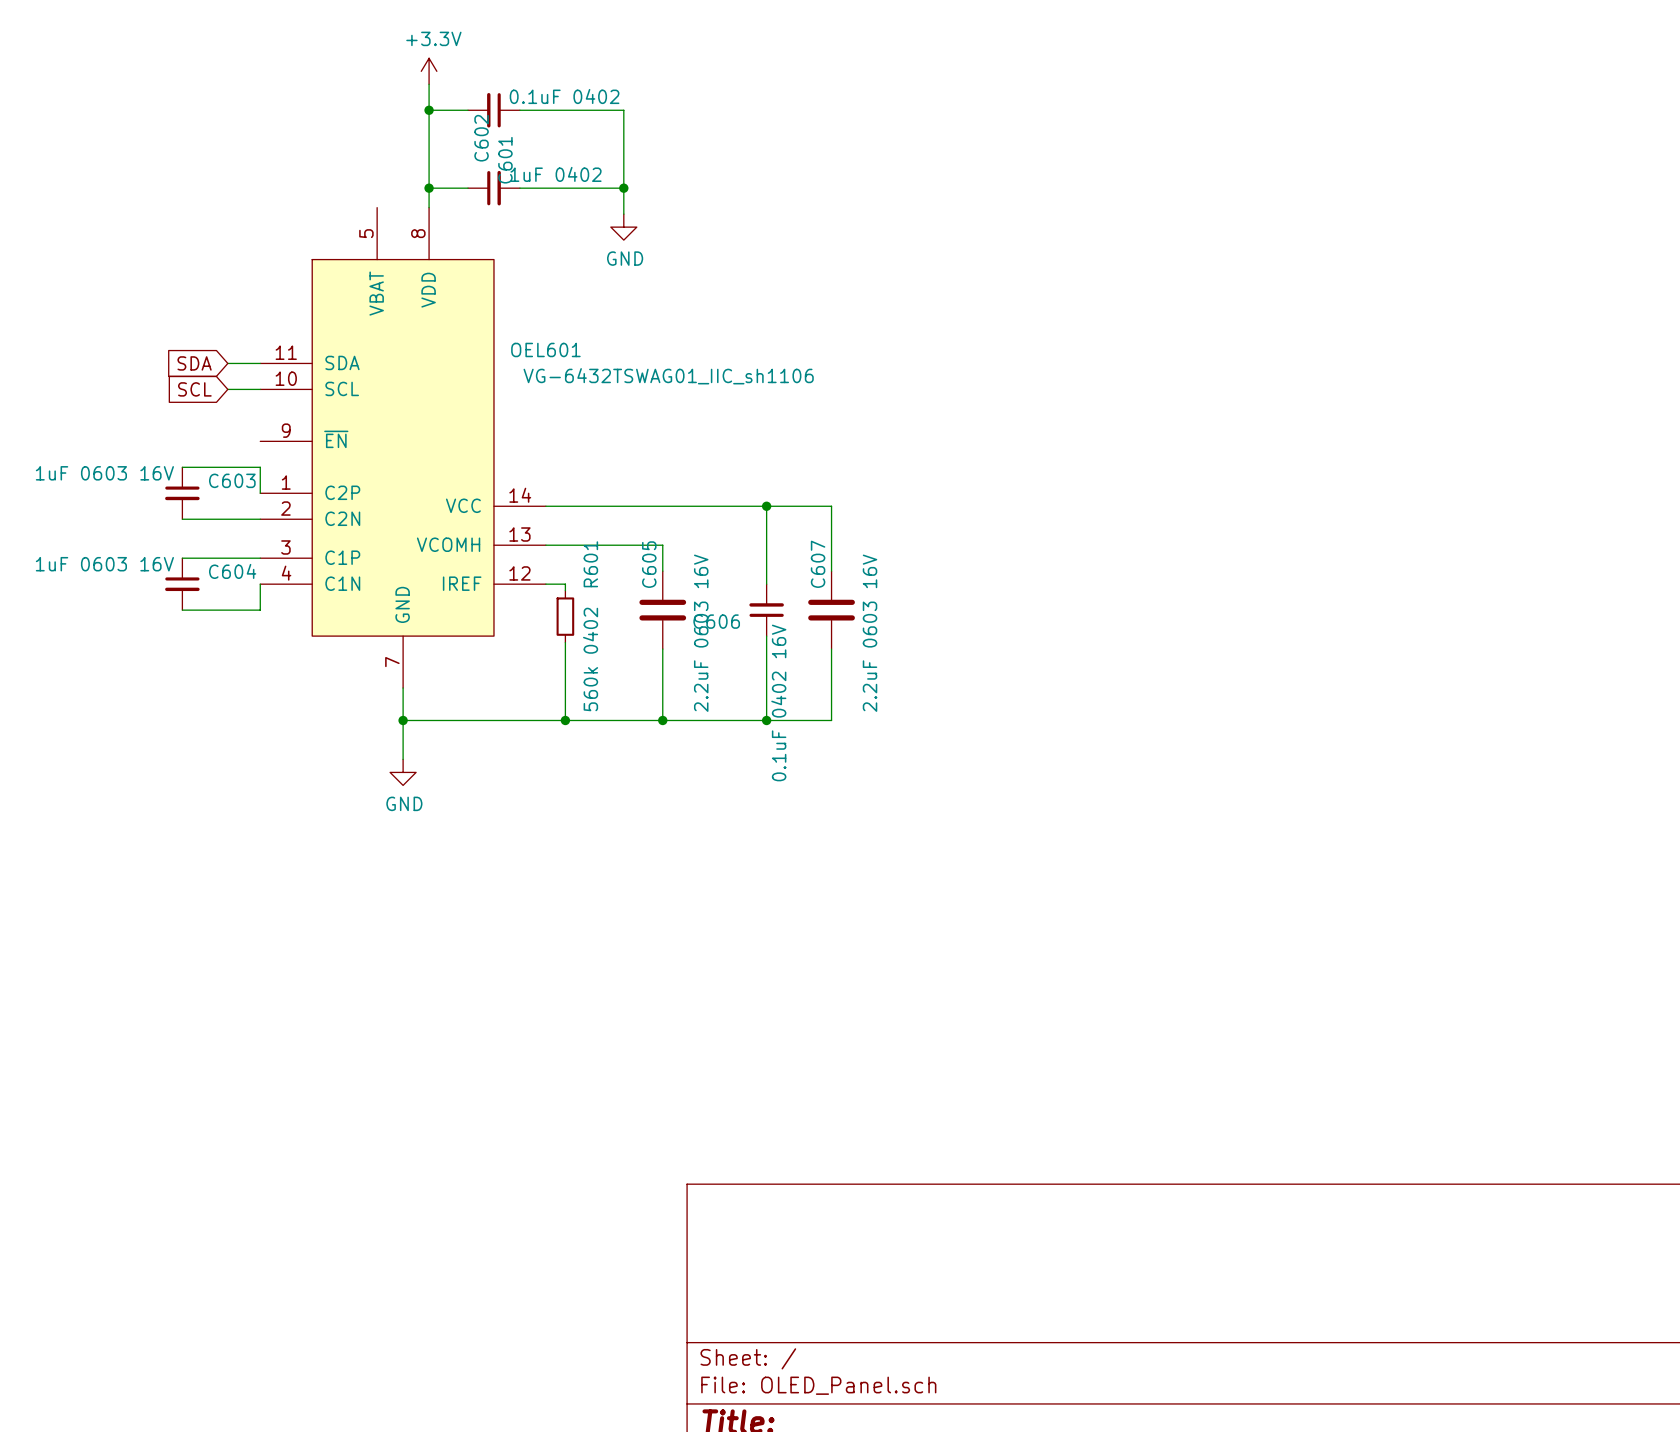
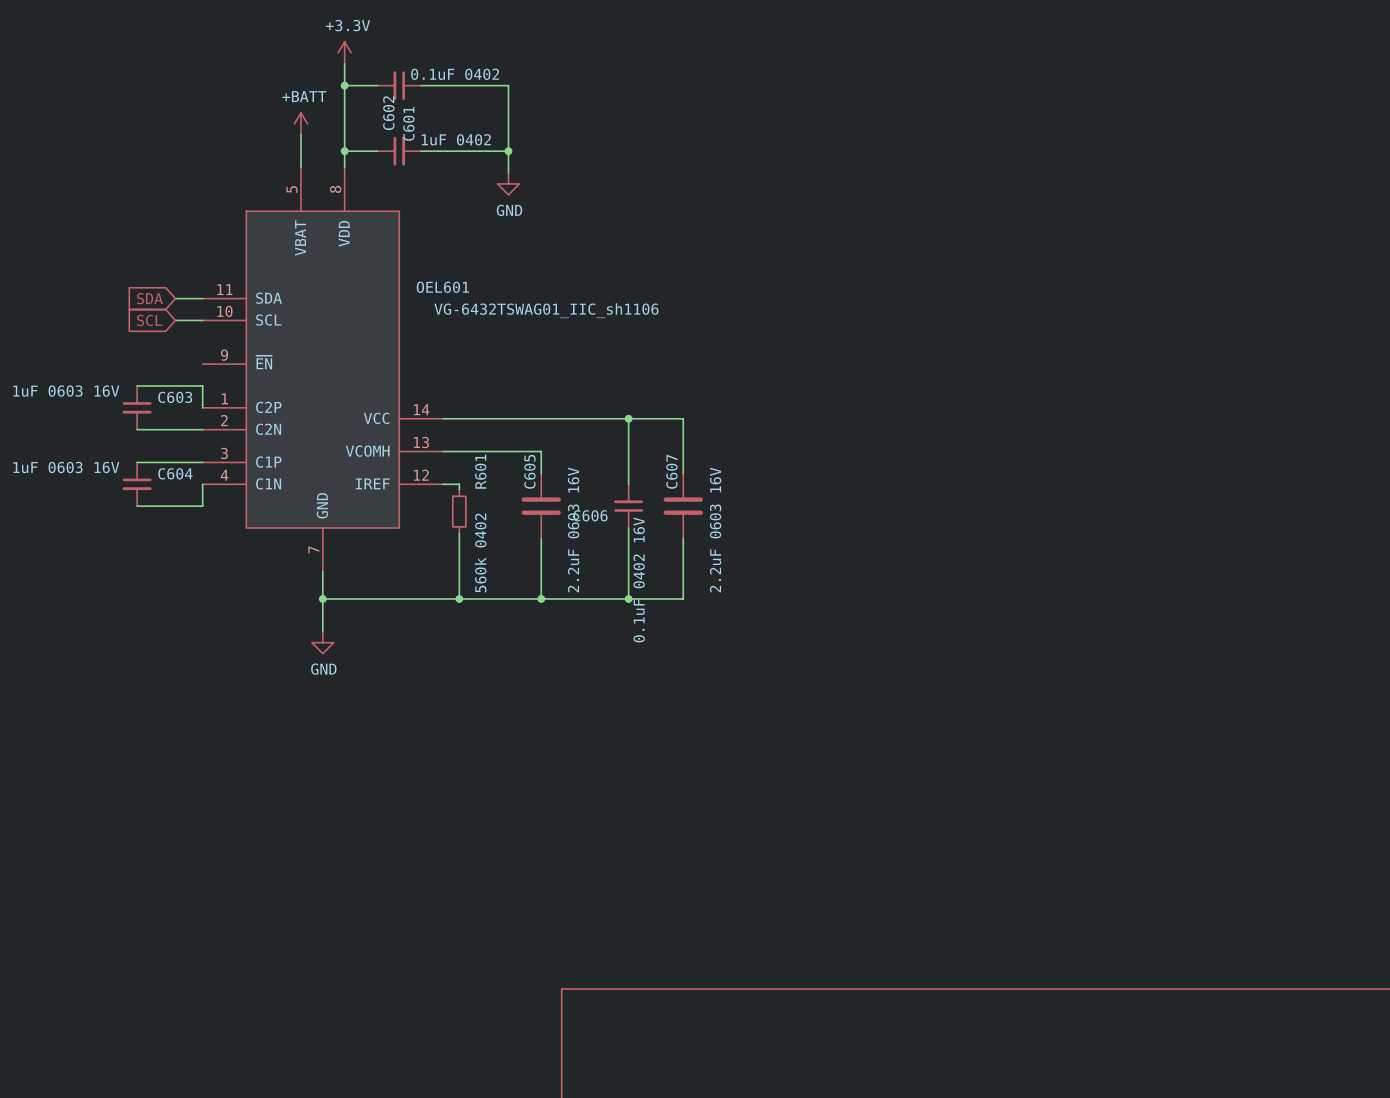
power symbol: none -> +BATT (300, 123)
wire: none -> (300, 134) (300, 167)

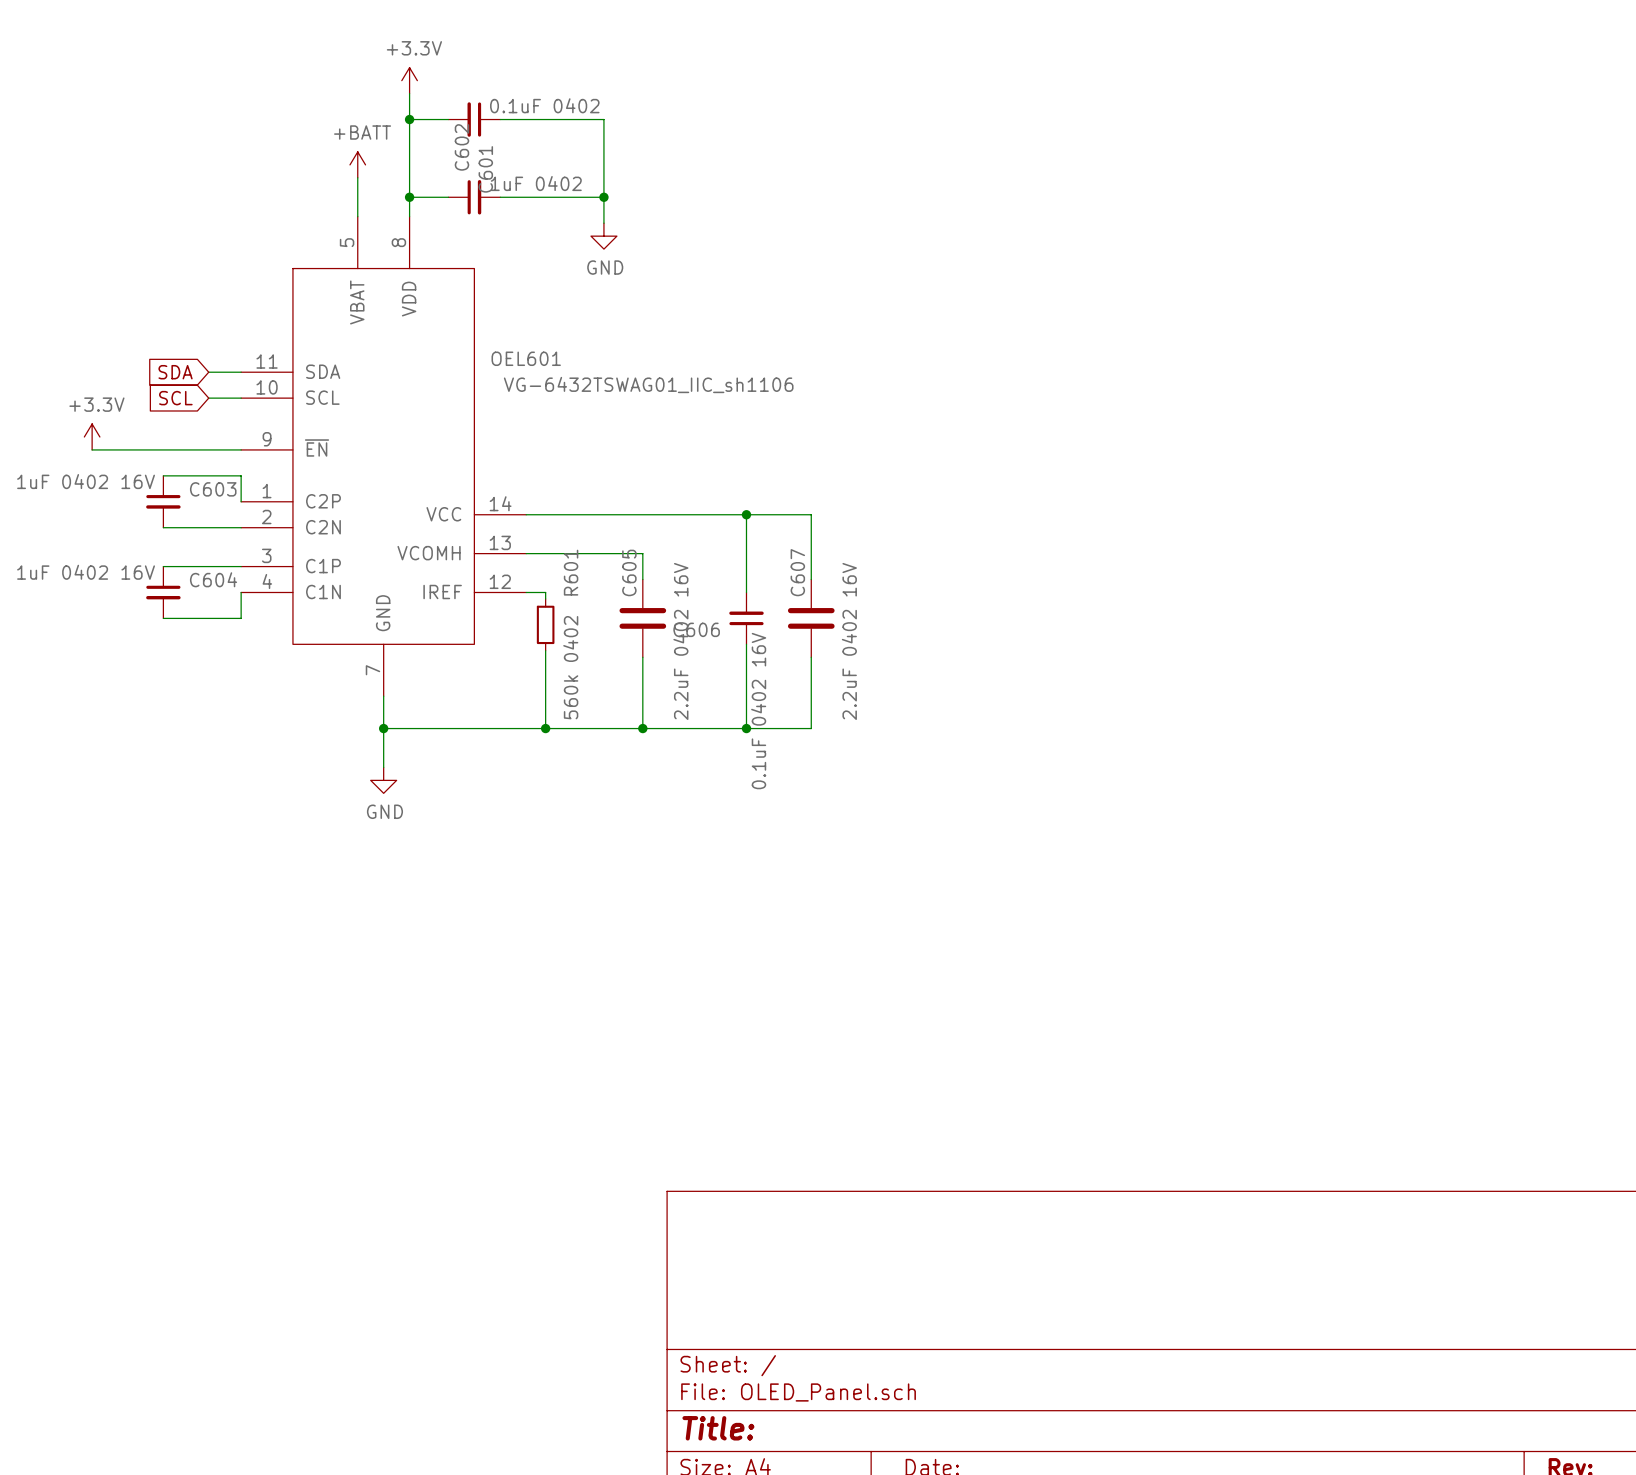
power symbol: none -> +3.3V (92, 437)
wire: none -> (92, 449) (241, 449)
C603 value: 1uF 0603 16V (66, 391) -> 1uF 0402 16V (86, 481)
C604 value: 1uF 0603 16V (66, 467) -> 1uF 0402 16V (86, 572)
C605 value: 2.2uF 0603 16V (573, 530) -> 2.2uF 0402 16V (680, 641)
C607 value: 2.2uF 0603 16V (715, 530) -> 2.2uF 0402 16V (849, 641)

